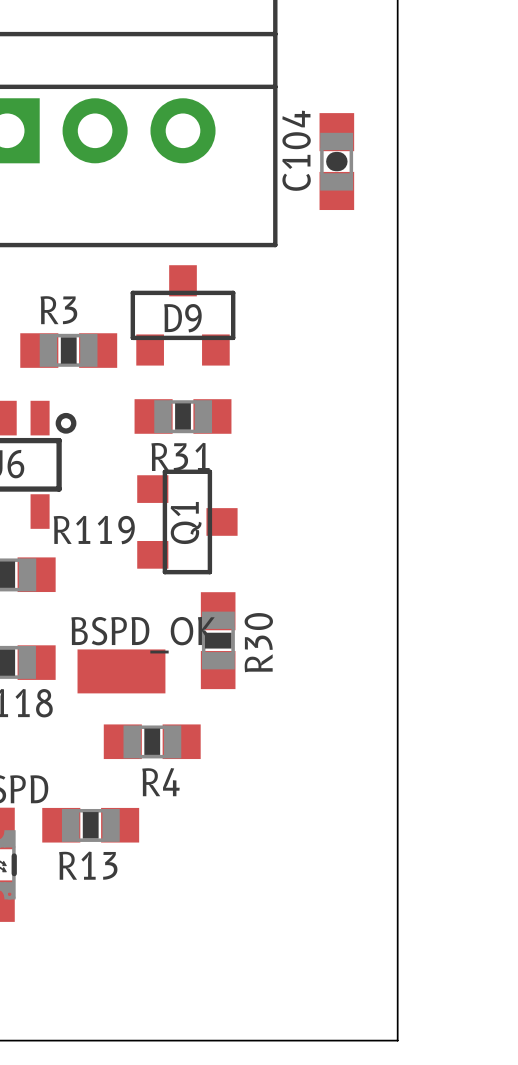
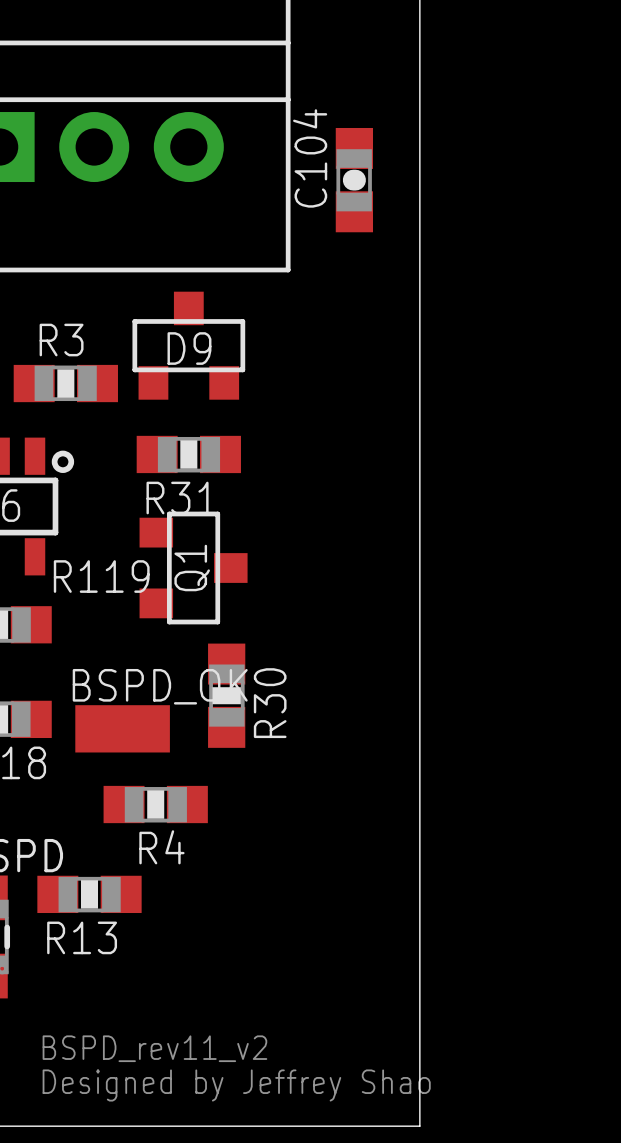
text: none -> BSPD_rev11_v2 (154, 1048)
text: none -> Designed by Jeffrey Shao (236, 1085)

